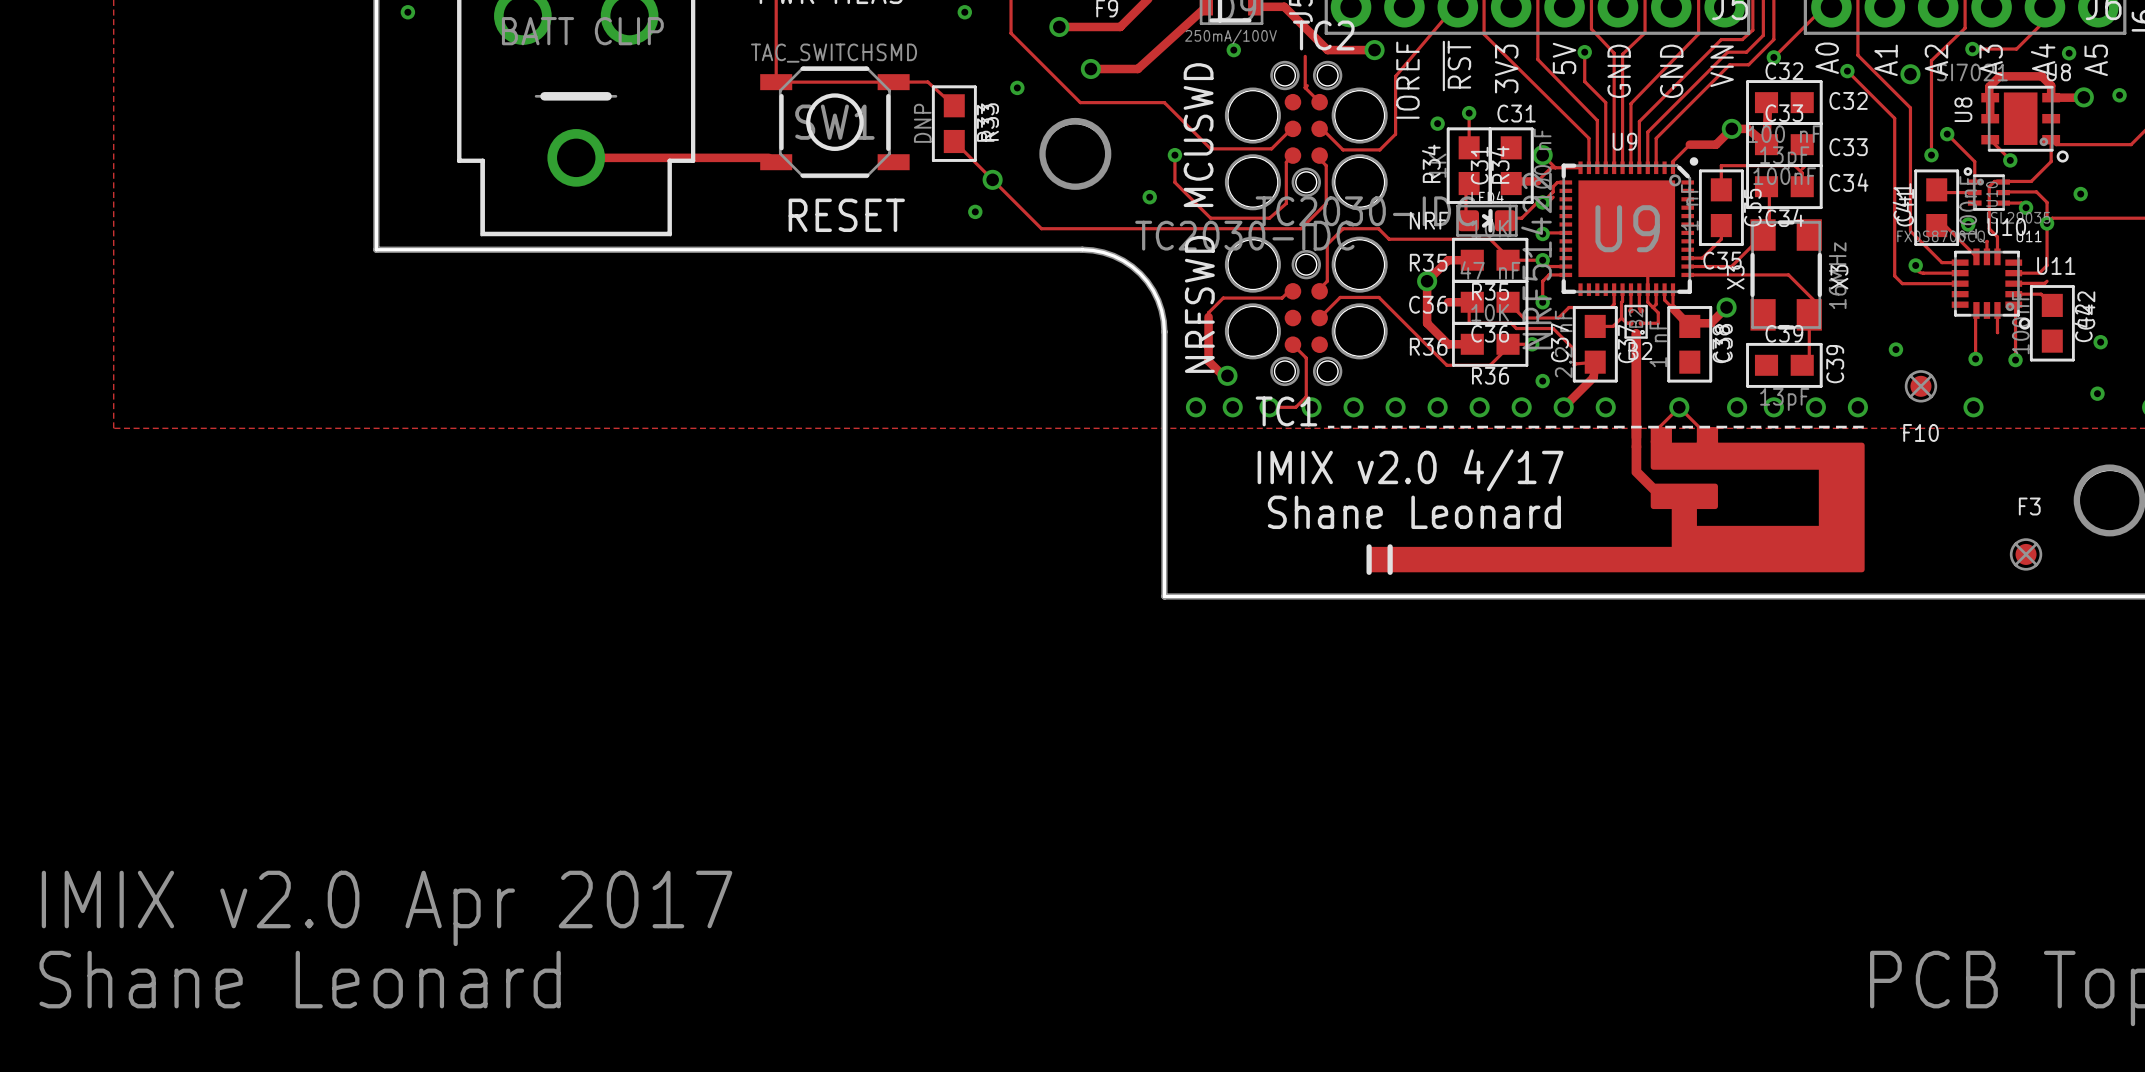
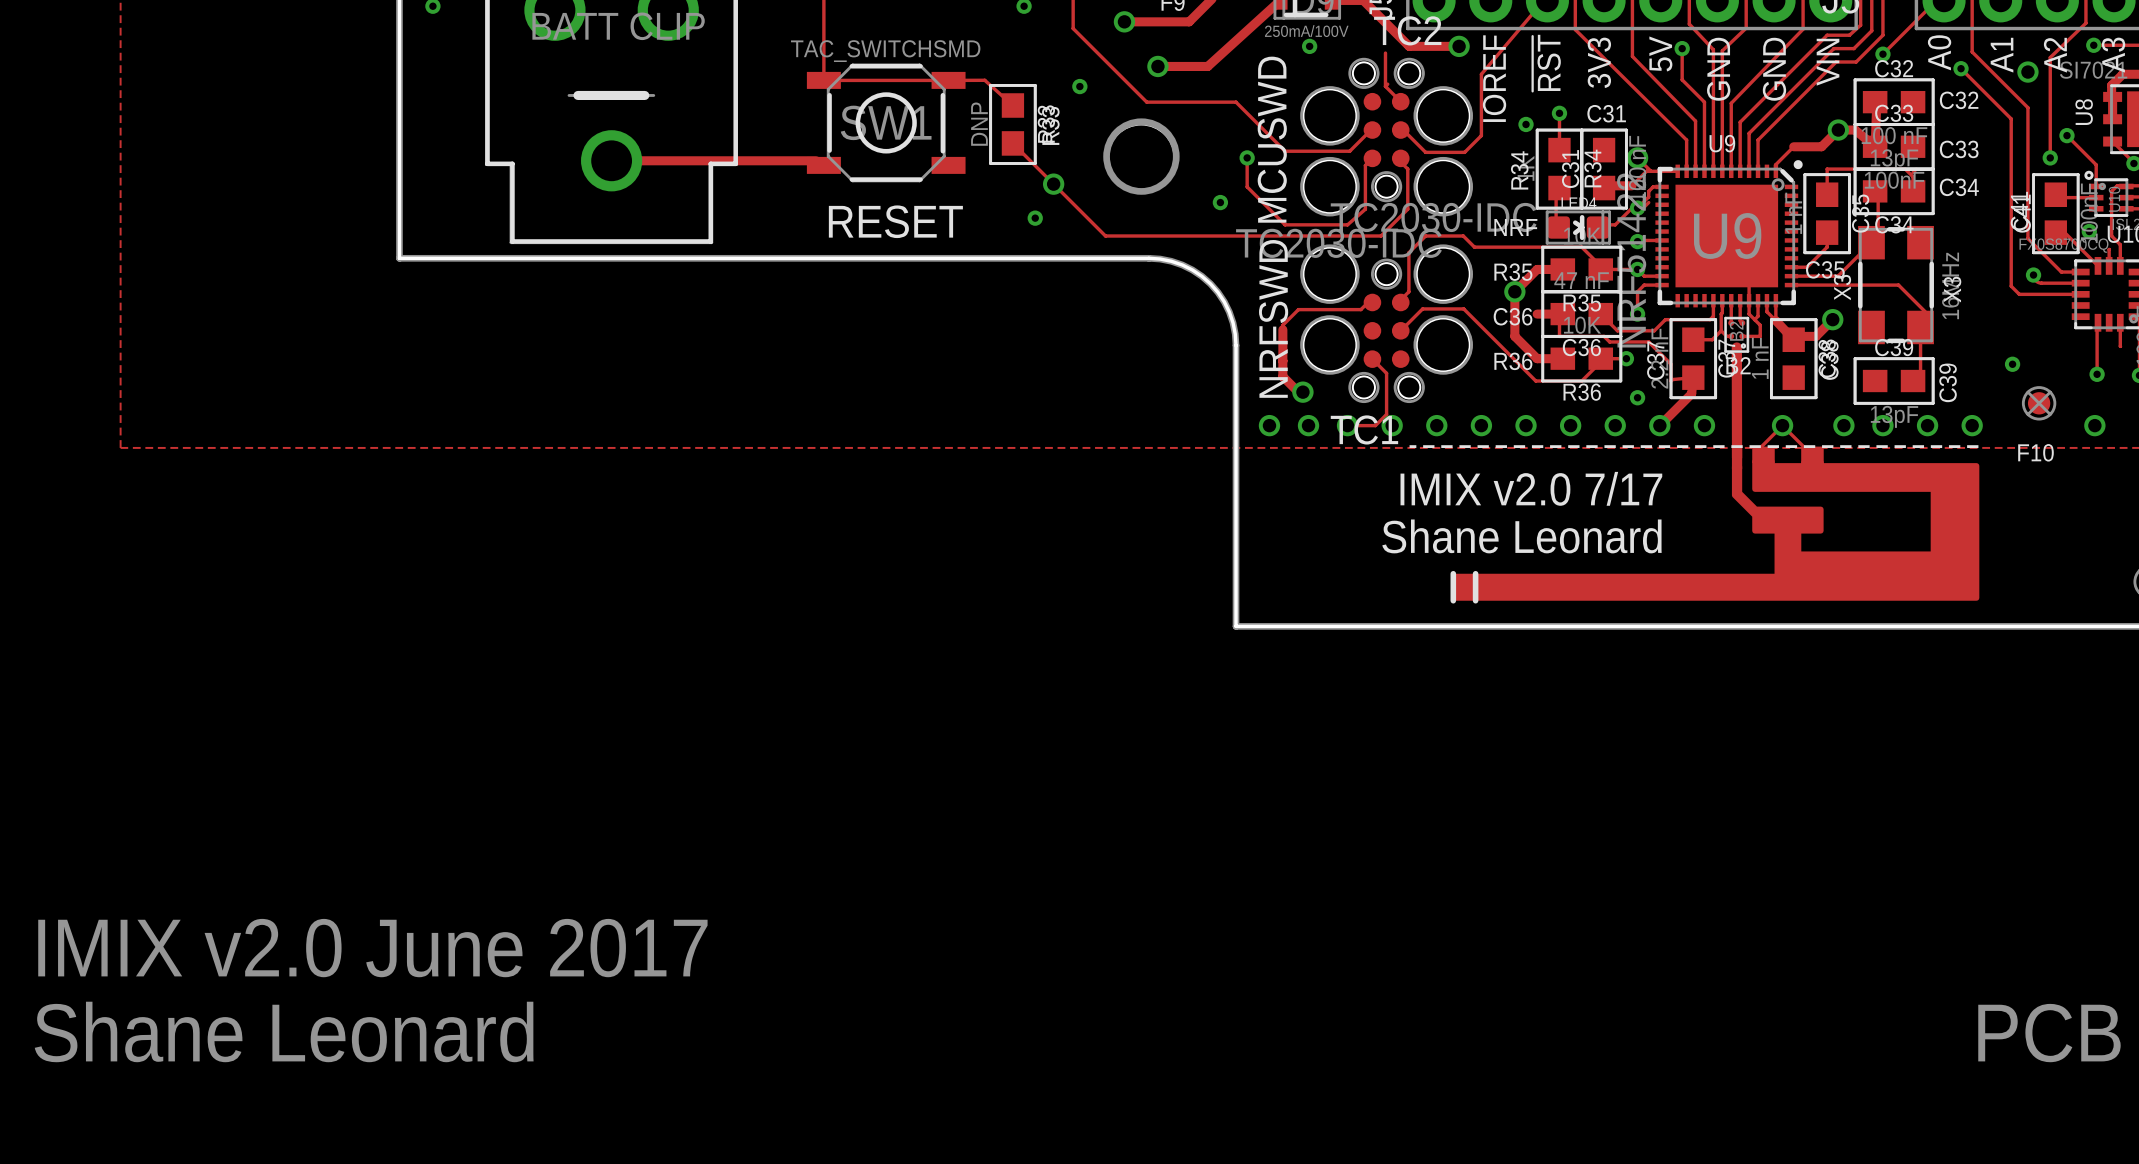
text: IMIX v2.0 4/17 (1410, 470) -> IMIX v2.0 7/17 (1531, 488)
text: IMIX v2.0 Apr 2017 (387, 908) -> IMIX v2.0 June 2017 (372, 948)

